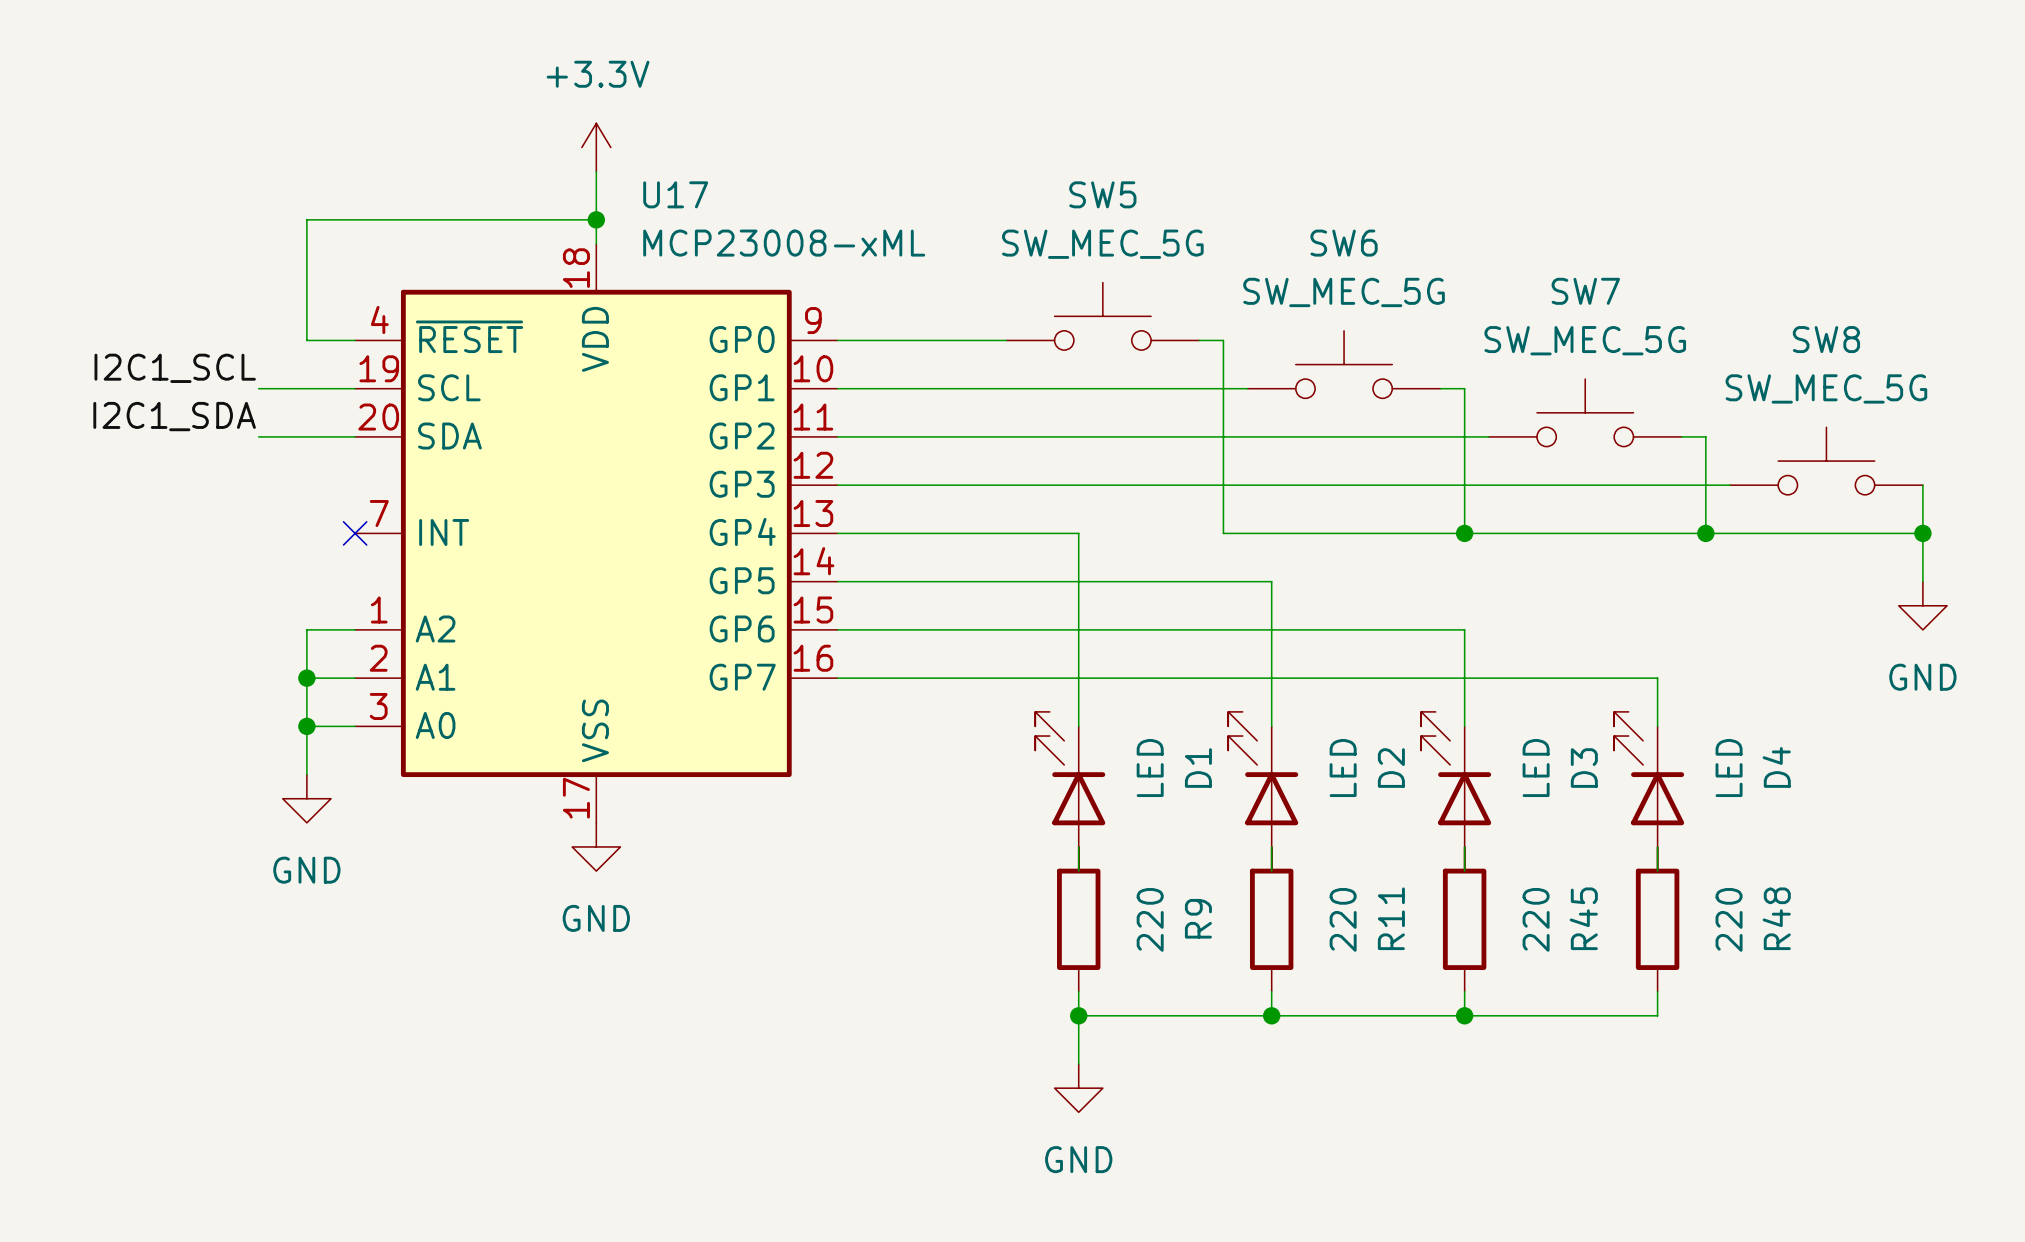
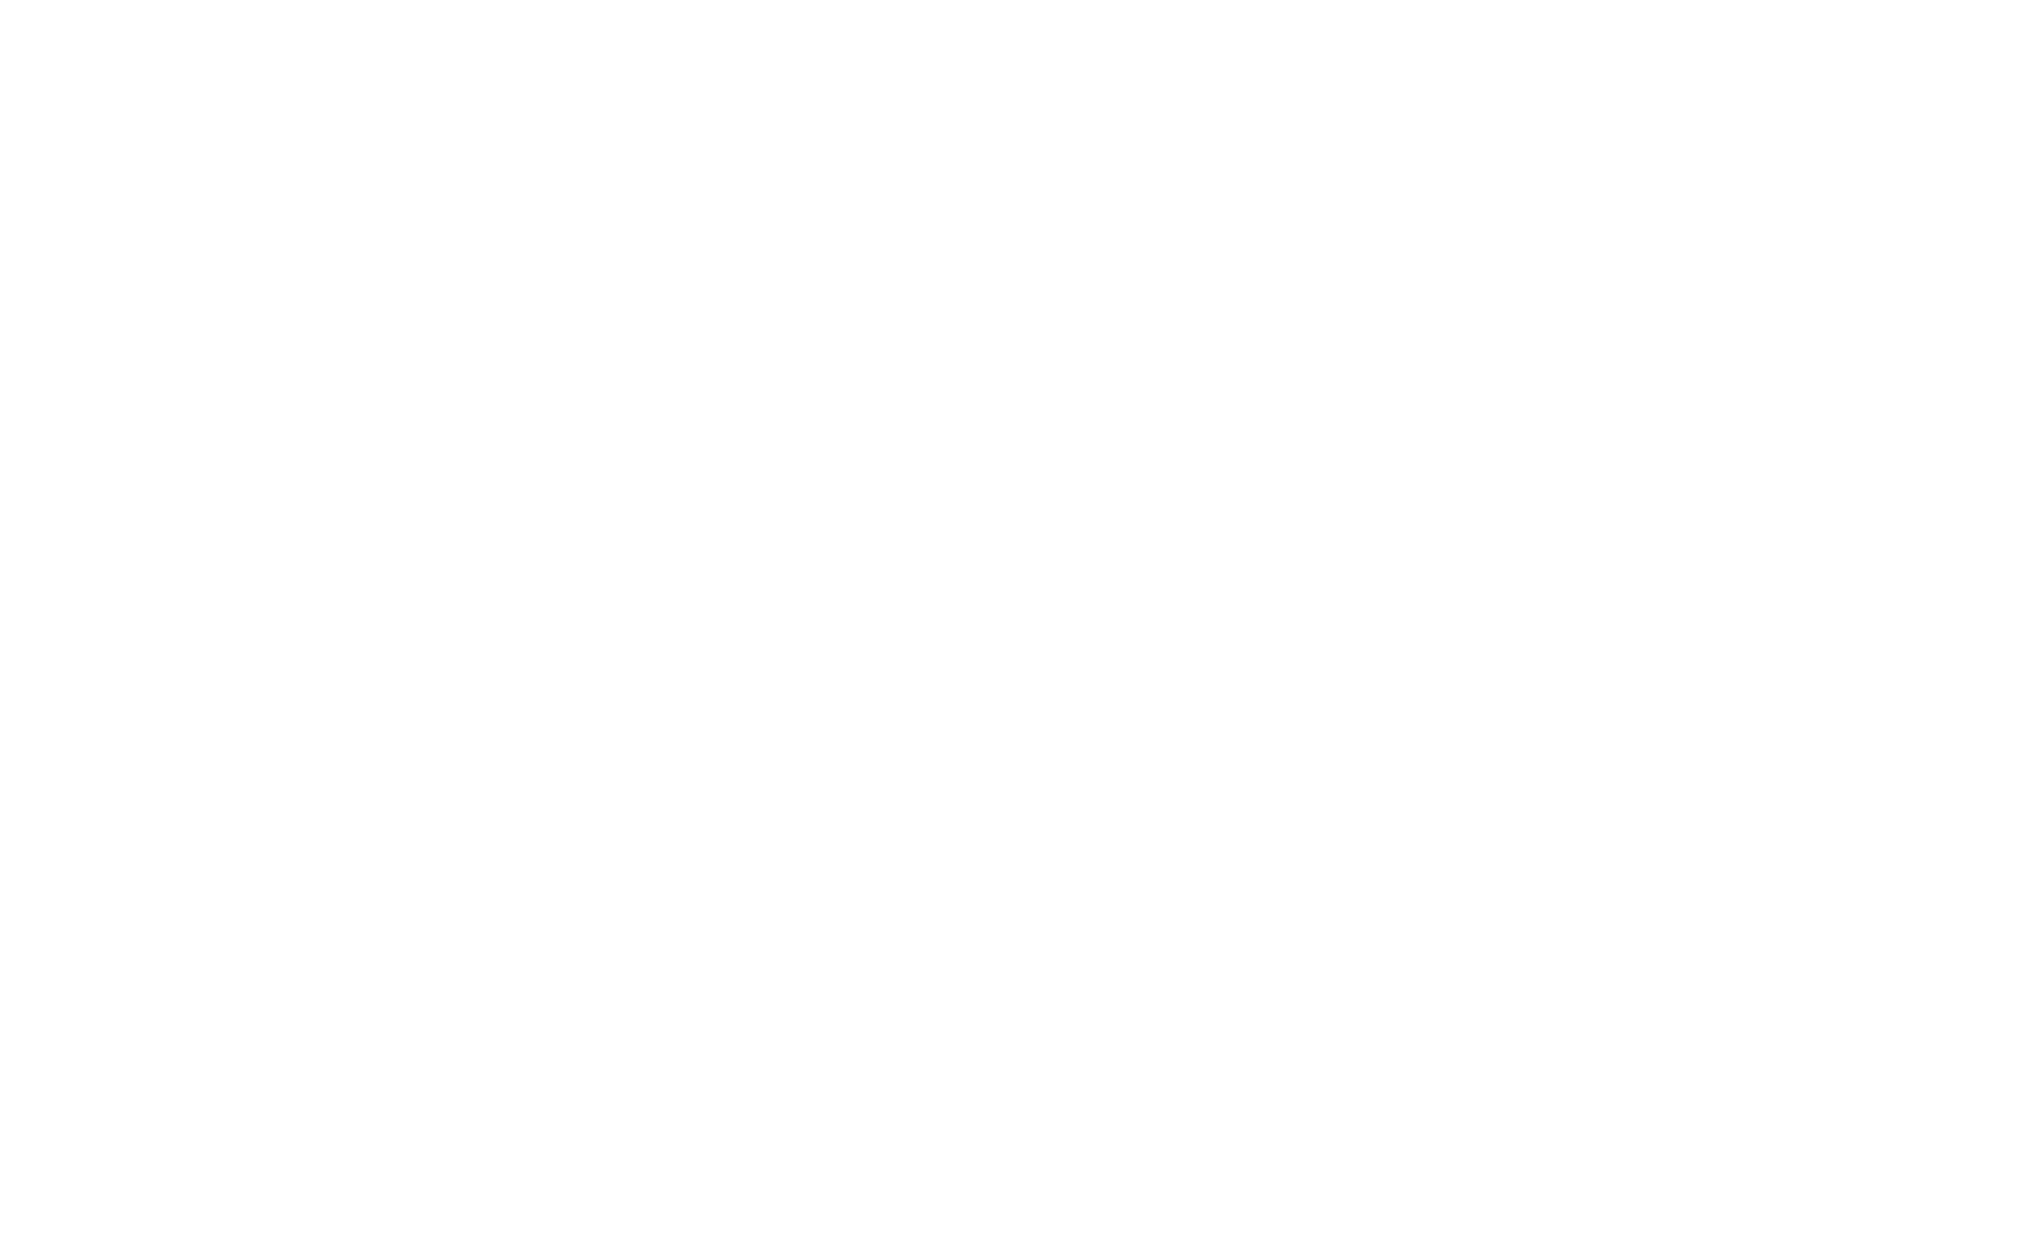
power symbol: +3.3V (596, 147) -> none
wire: (596, 171) (596, 243) -> none
wire: (596, 219) (306, 219) (306, 340) (355, 340) -> none
junction: (596, 219) -> none
SW5: SW_MEC_5G (1102, 316) -> none
wire: (837, 340) (1006, 340) -> none
wire: (1199, 340) (1223, 340) (1223, 533) (1922, 533) -> none
SW6: SW_MEC_5G (1344, 364) -> none
label: I2C1_SCL (175, 368) -> none
wire: (258, 388) (355, 388) -> none
wire: (837, 388) (1247, 388) -> none
wire: (1440, 388) (1464, 388) (1464, 533) -> none
SW7: SW_MEC_5G (1585, 412) -> none
label: I2C1_SDA (174, 416) -> none
wire: (258, 436) (355, 436) -> none
wire: (837, 436) (1488, 436) -> none
wire: (1681, 436) (1705, 436) (1705, 533) -> none
SW8: SW_MEC_5G (1826, 461) -> none
wire: (837, 485) (1729, 485) -> none
wire: (1922, 485) (1922, 581) -> none
no-connect mark: (355, 533) -> none
U17: MCP23008-xML (596, 533) -> none
wire: (837, 533) (1078, 533) (1078, 726) -> none
junction: (1464, 533) -> none
junction: (1705, 533) -> none
junction: (1922, 533) -> none
wire: (837, 581) (1271, 581) (1271, 726) -> none
power symbol: GND (1922, 605) -> none
wire: (355, 629) (306, 629) (306, 774) -> none
wire: (837, 629) (1464, 629) (1464, 726) -> none
wire: (306, 678) (355, 678) -> none
junction: (306, 678) -> none
wire: (837, 678) (1657, 678) (1657, 726) -> none
wire: (306, 726) (355, 726) -> none
junction: (306, 726) -> none
D1: LED (1070, 791) -> none
D2: LED (1263, 791) -> none
D3: LED (1456, 791) -> none
D4: LED (1649, 791) -> none
power symbol: GND (306, 798) -> none
power symbol: GND (596, 846) -> none
wire: (1078, 846) (1078, 871) -> none
wire: (1271, 846) (1271, 871) -> none
wire: (1464, 846) (1464, 871) -> none
wire: (1657, 846) (1657, 871) -> none
R9: 220 (1078, 919) -> none
R11: 220 (1271, 919) -> none
R45: 220 (1464, 919) -> none
R48: 220 (1657, 919) -> none
wire: (1078, 991) (1078, 1064) -> none
wire: (1271, 991) (1271, 1015) -> none
wire: (1464, 991) (1464, 1015) -> none
wire: (1657, 991) (1657, 1015) (1078, 1015) -> none
junction: (1078, 1015) -> none
junction: (1271, 1015) -> none
junction: (1464, 1015) -> none
power symbol: GND (1078, 1088) -> none

